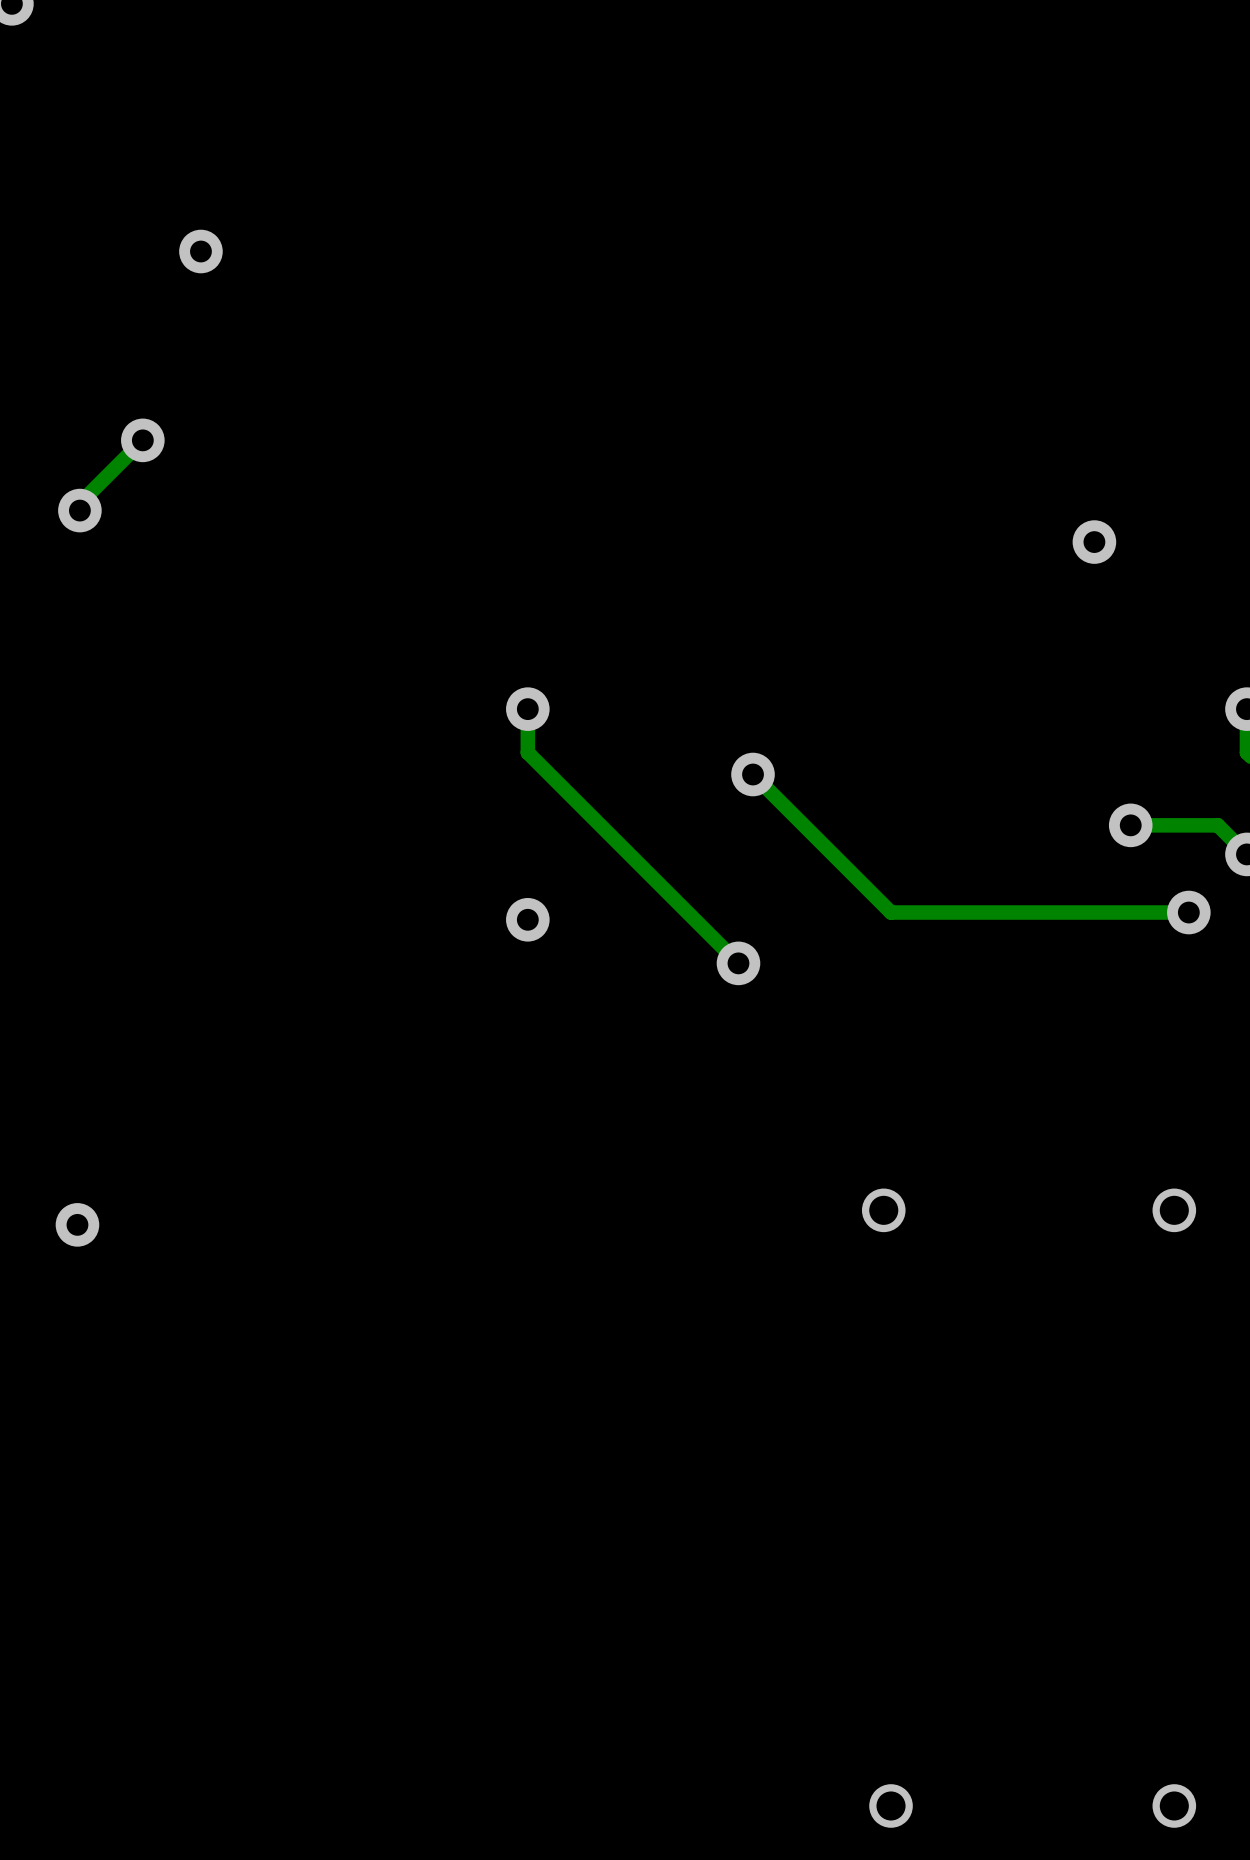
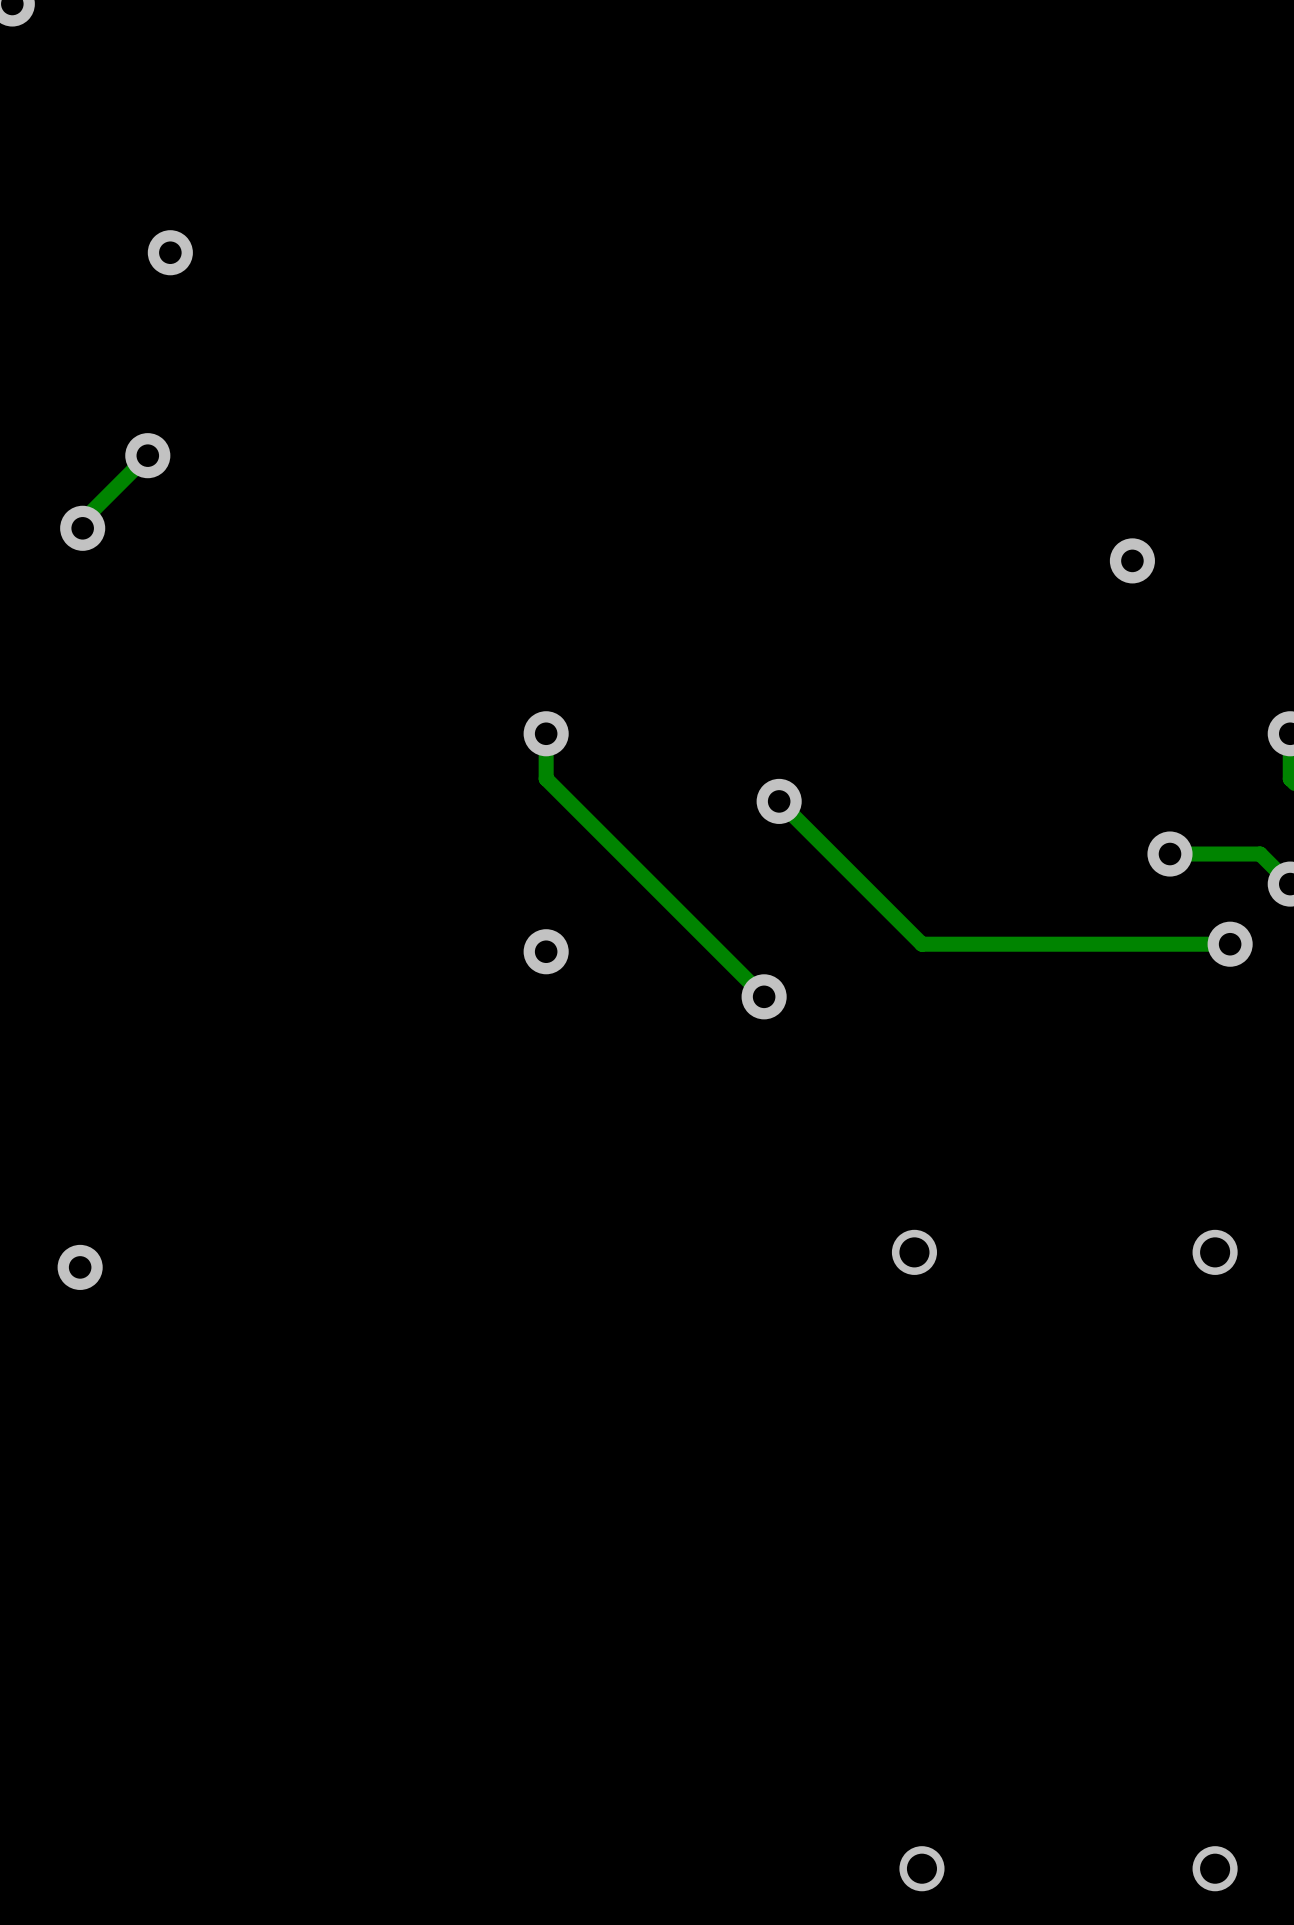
via position: (200, 251) -> (170, 252)

